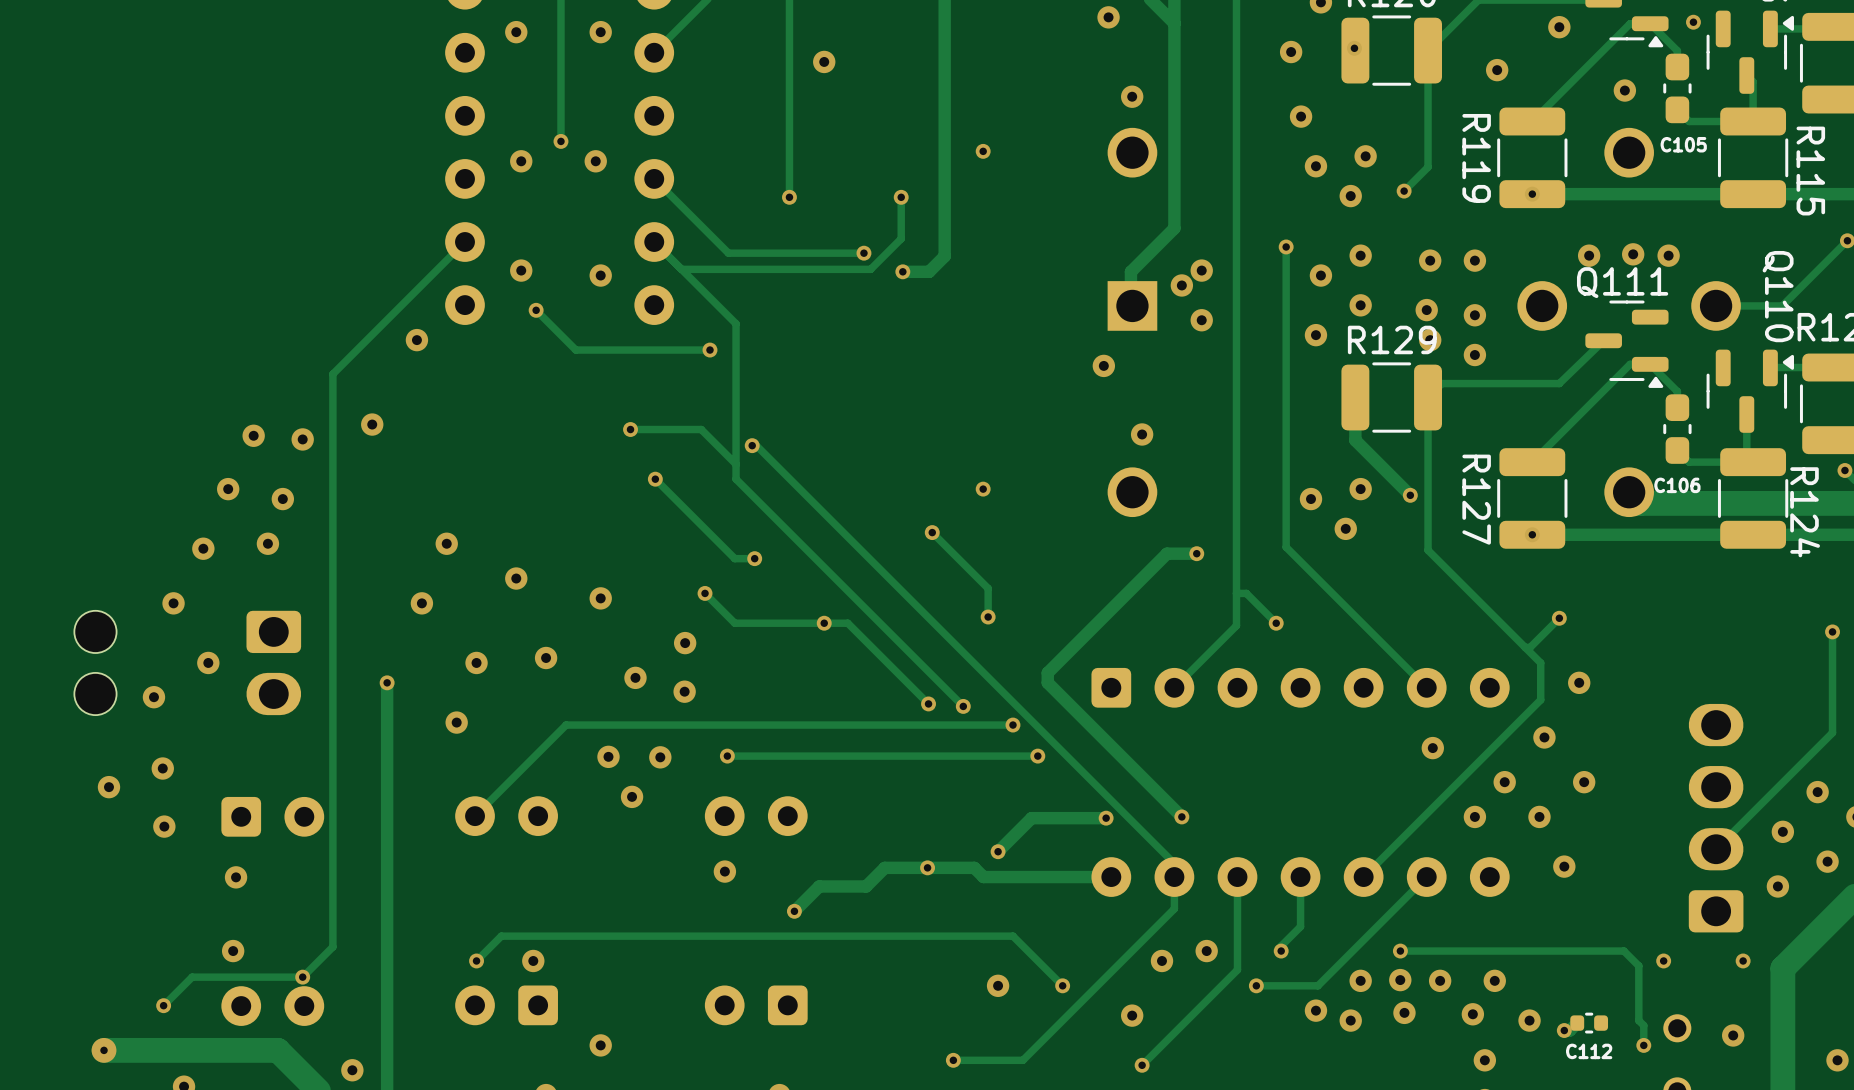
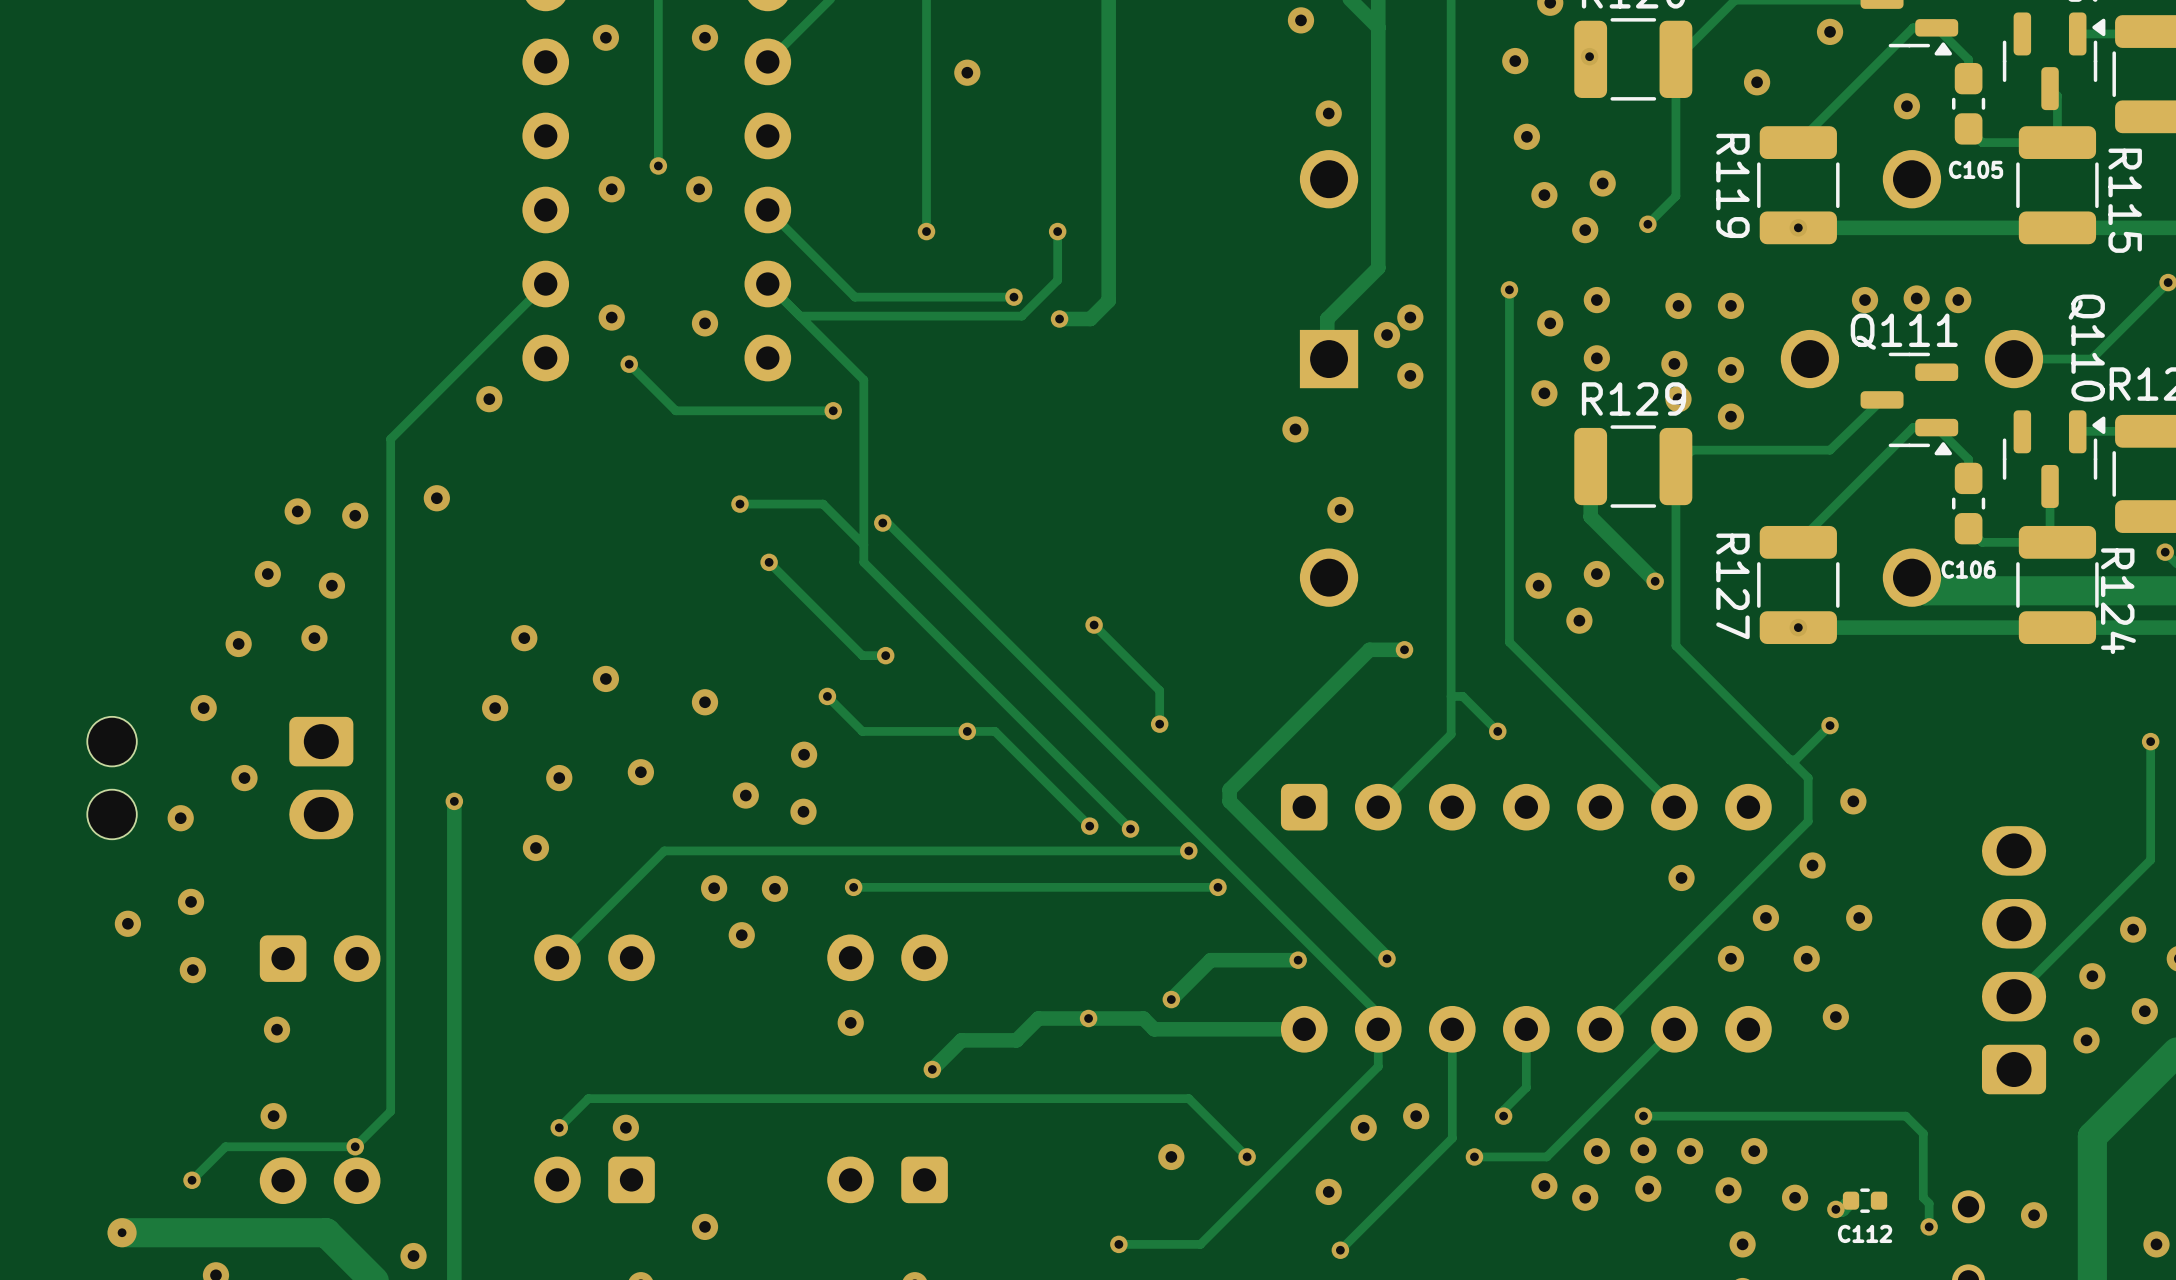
via: (1693, 22) -> none
via: (983, 151) -> none
via: (983, 489) -> none
via: (1663, 960) -> none
via: (1743, 960) -> none

